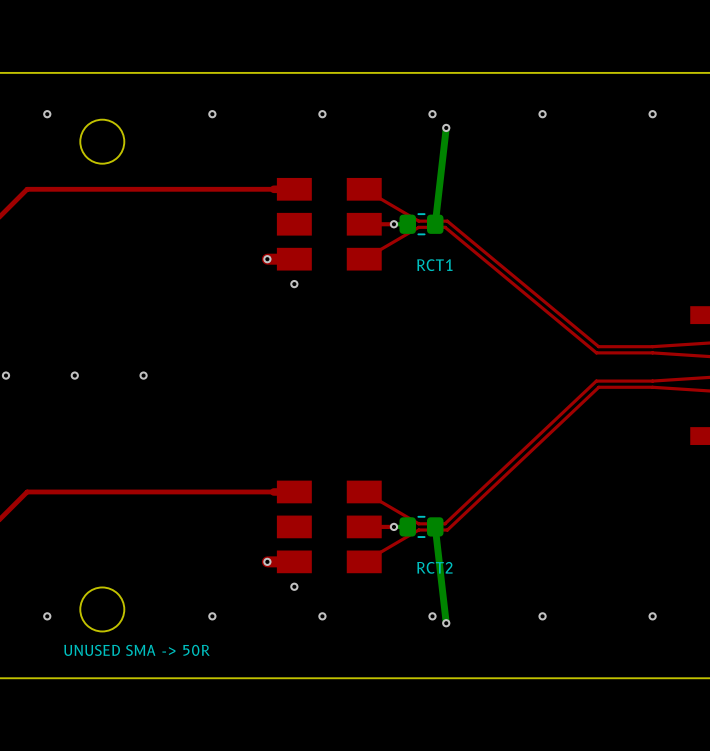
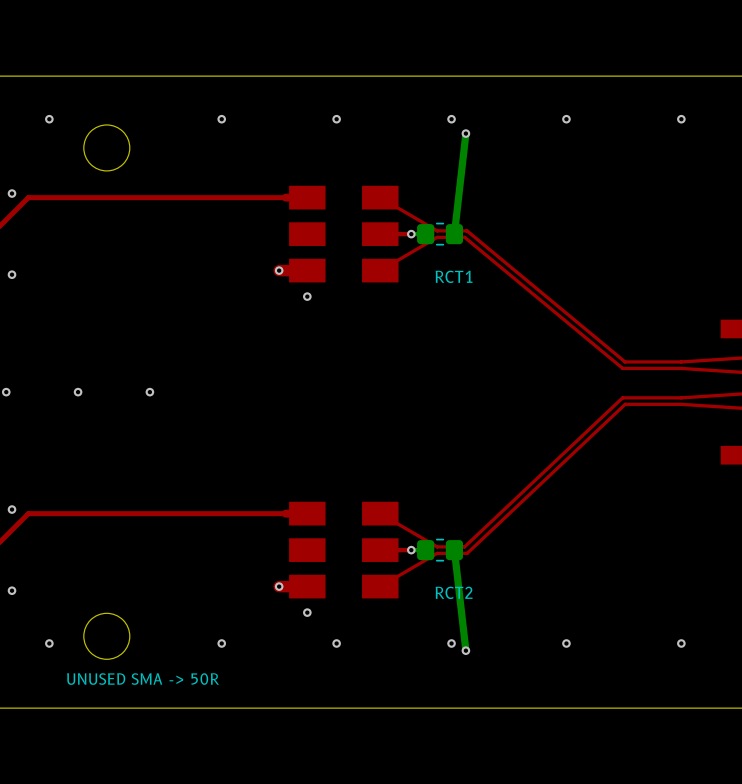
via: none -> (12, 193)
via: none -> (12, 274)
via: none -> (12, 509)
via: none -> (12, 590)

